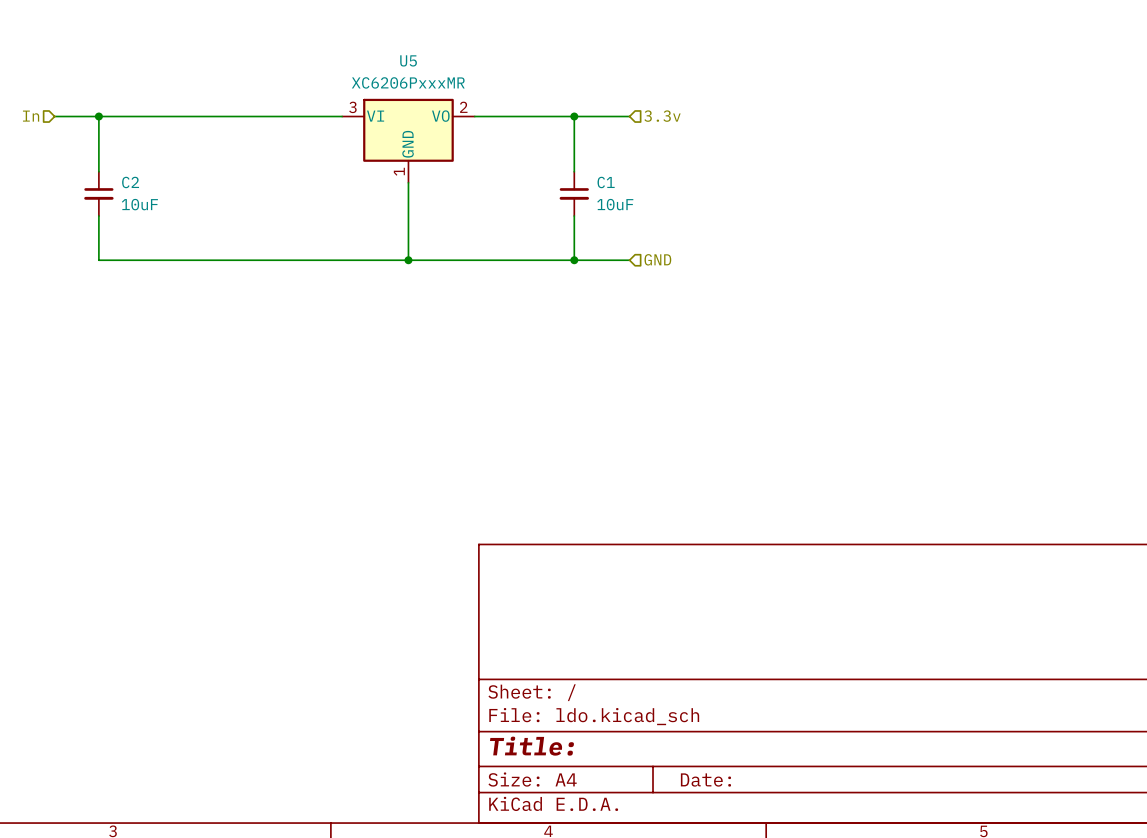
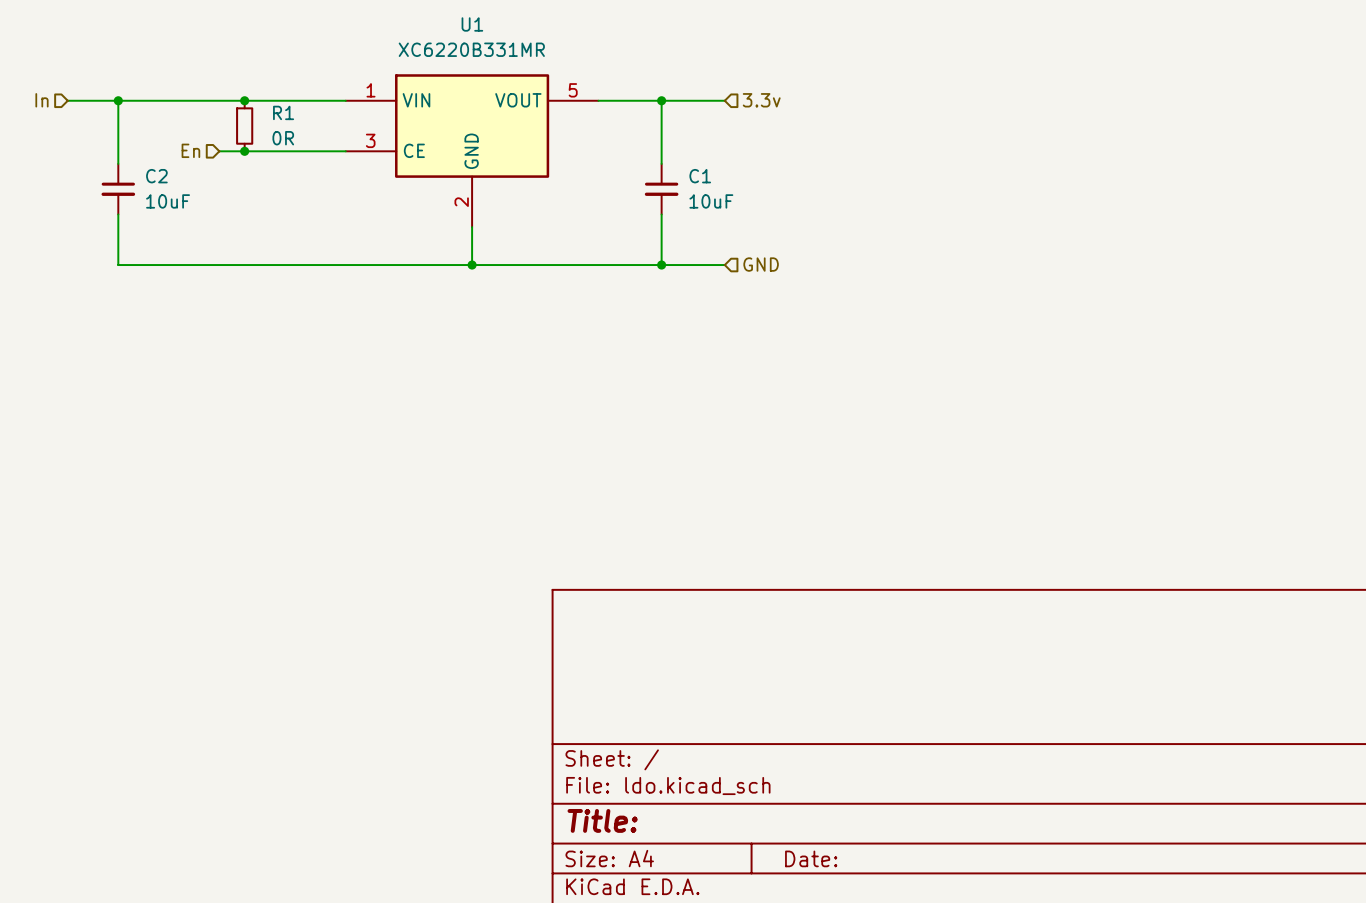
junction: none -> (244, 100)
R1: none -> 0R (244, 126)
U5: XC6206PxxxMR (408, 140) -> none
hierarchical label: none -> En (190, 150)
wire: none -> (219, 151) (345, 151)
junction: none -> (244, 151)
U1: none -> XC6220B331MR (472, 150)

